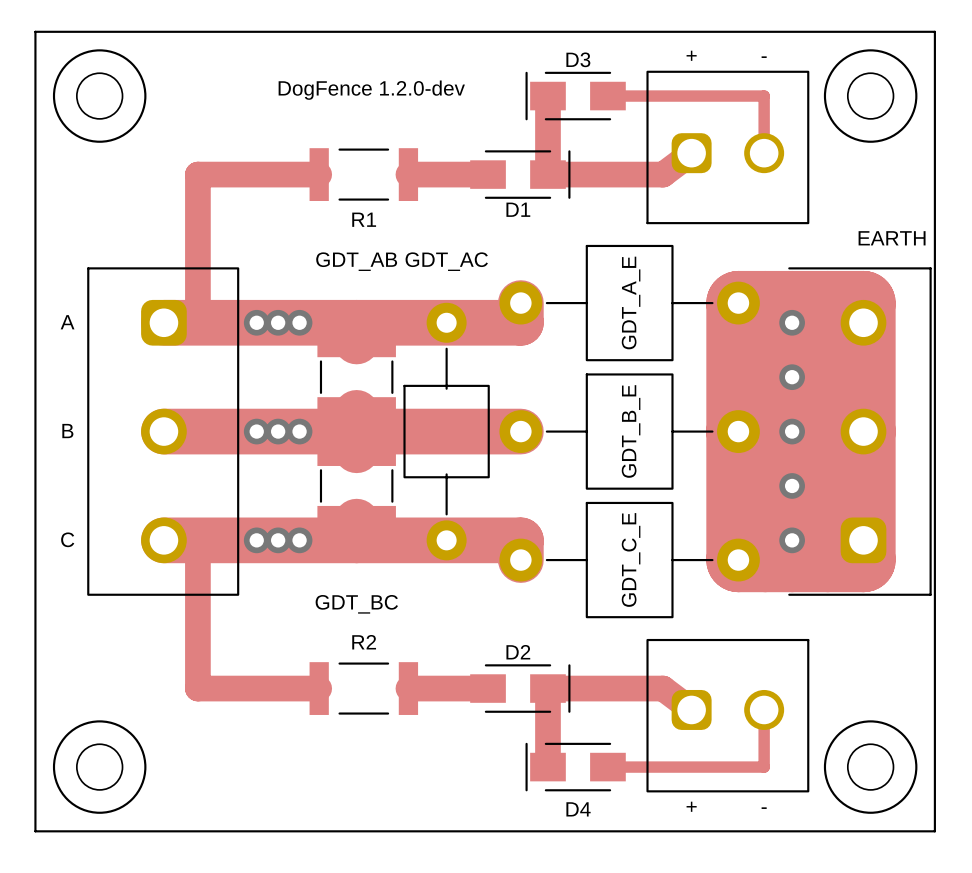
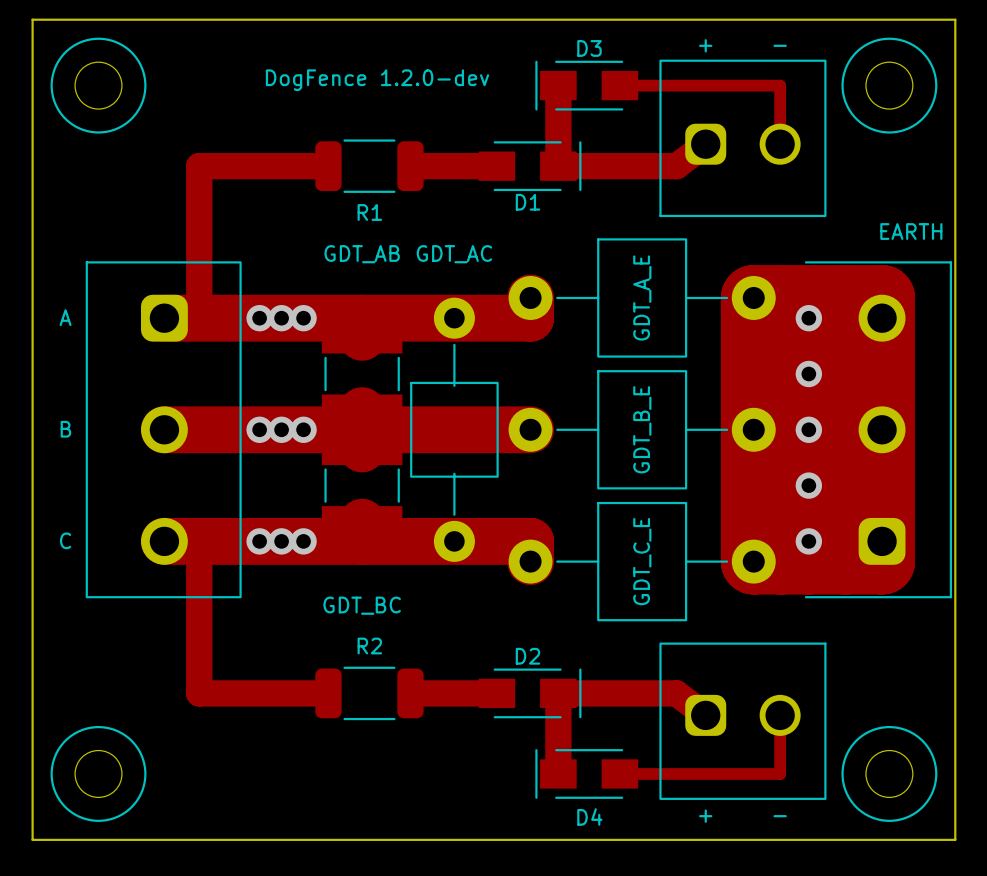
R1 footprint: [309, 148, 419, 201] -> [315, 139, 424, 193]
R2 footprint: [309, 662, 419, 715] -> [315, 666, 424, 721]

